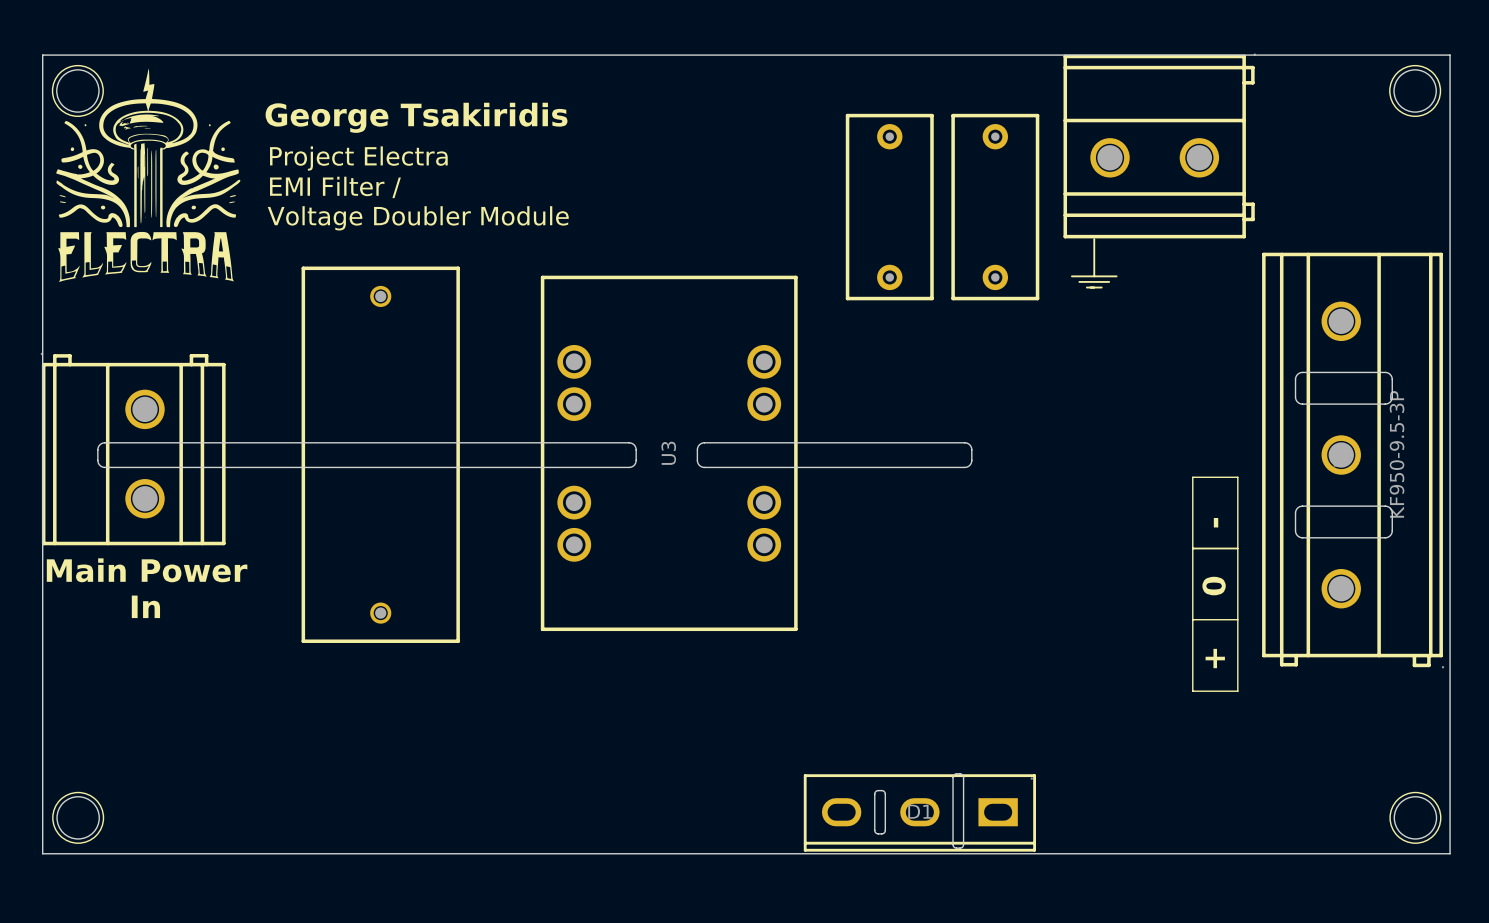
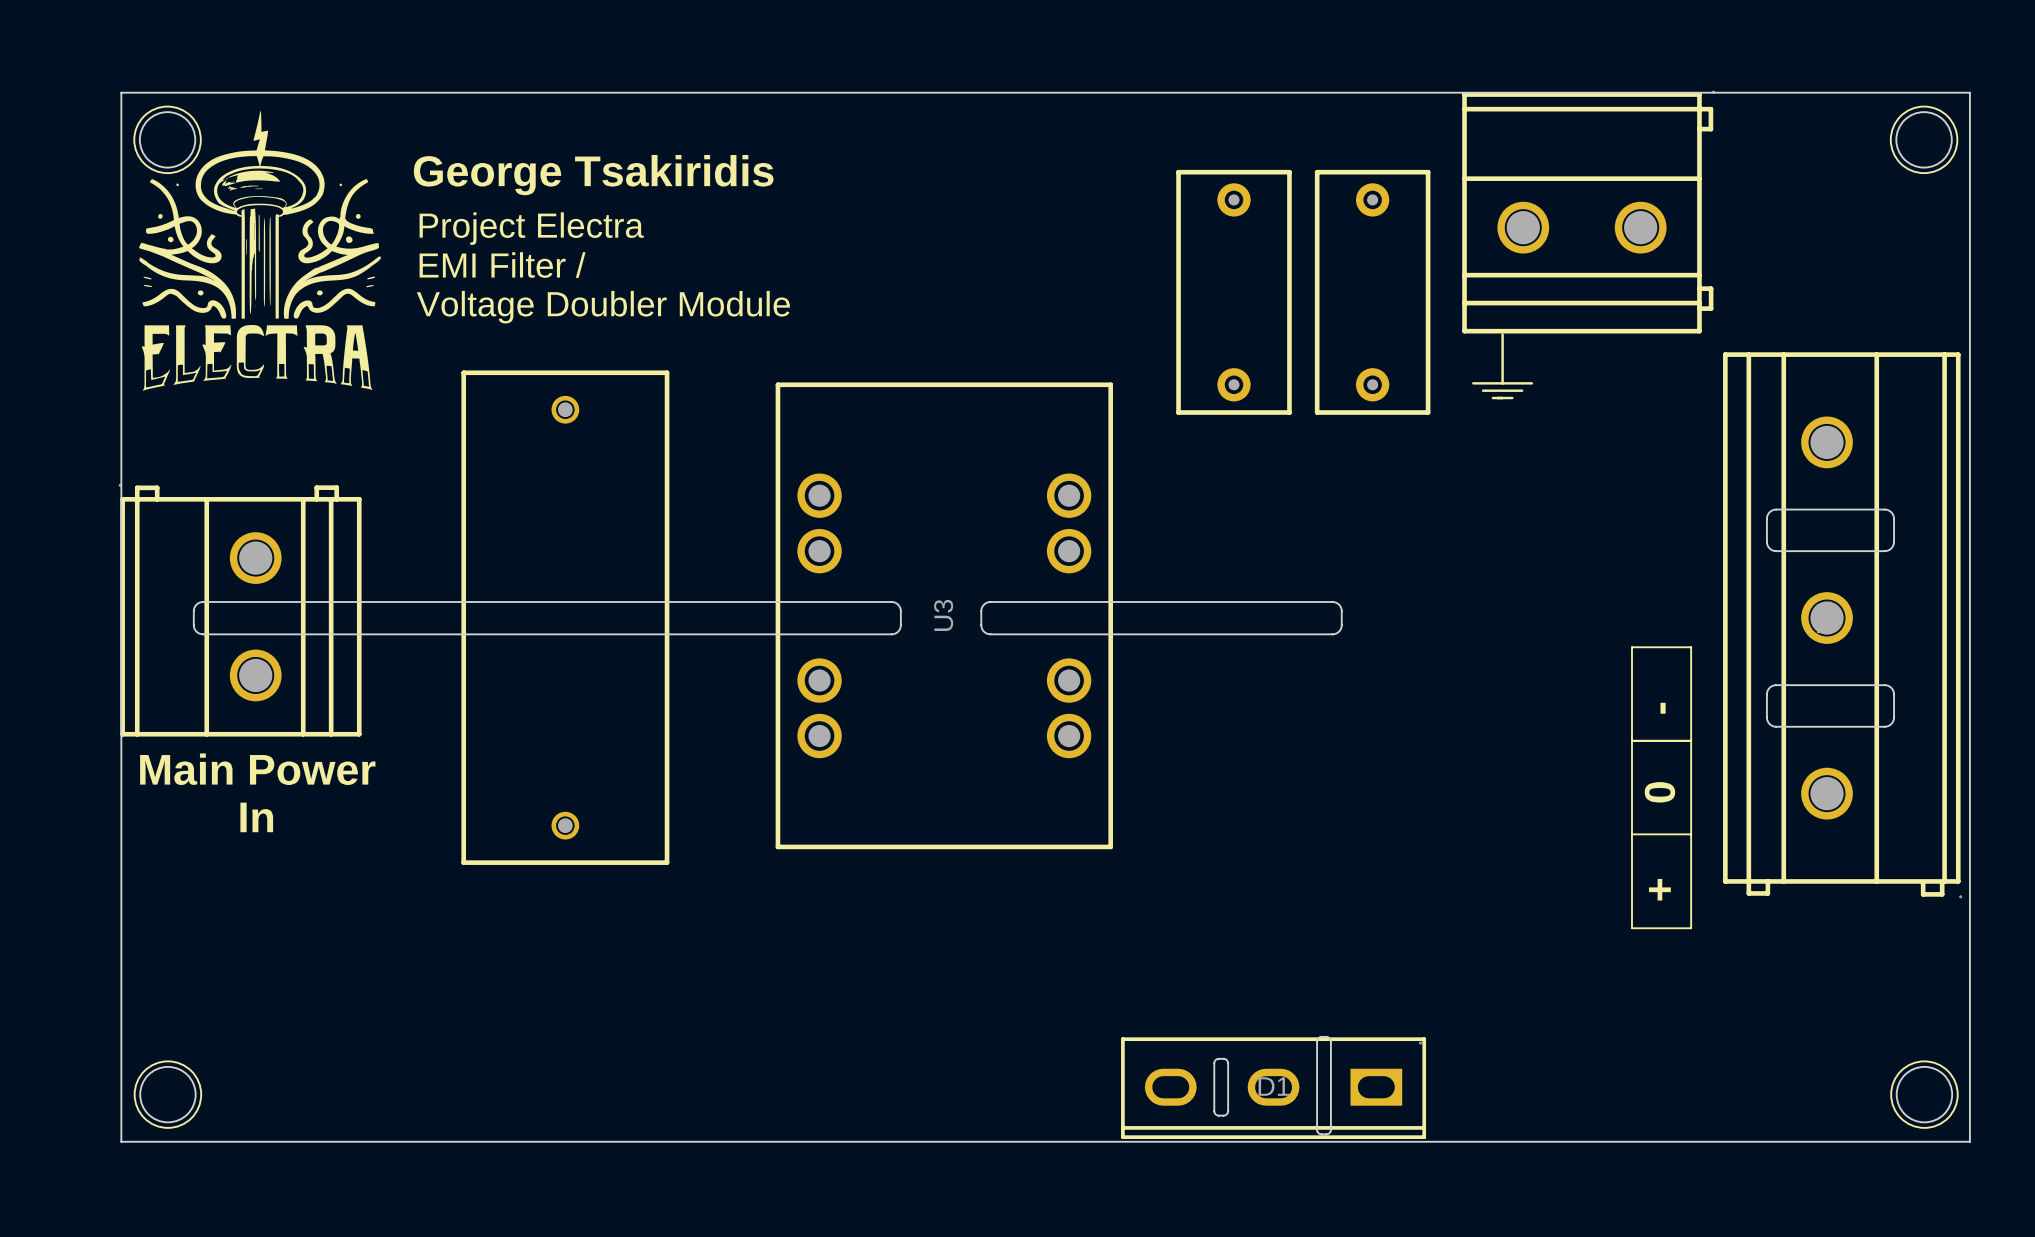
part value: KF950-9.5-3P (1397, 454) -> none

